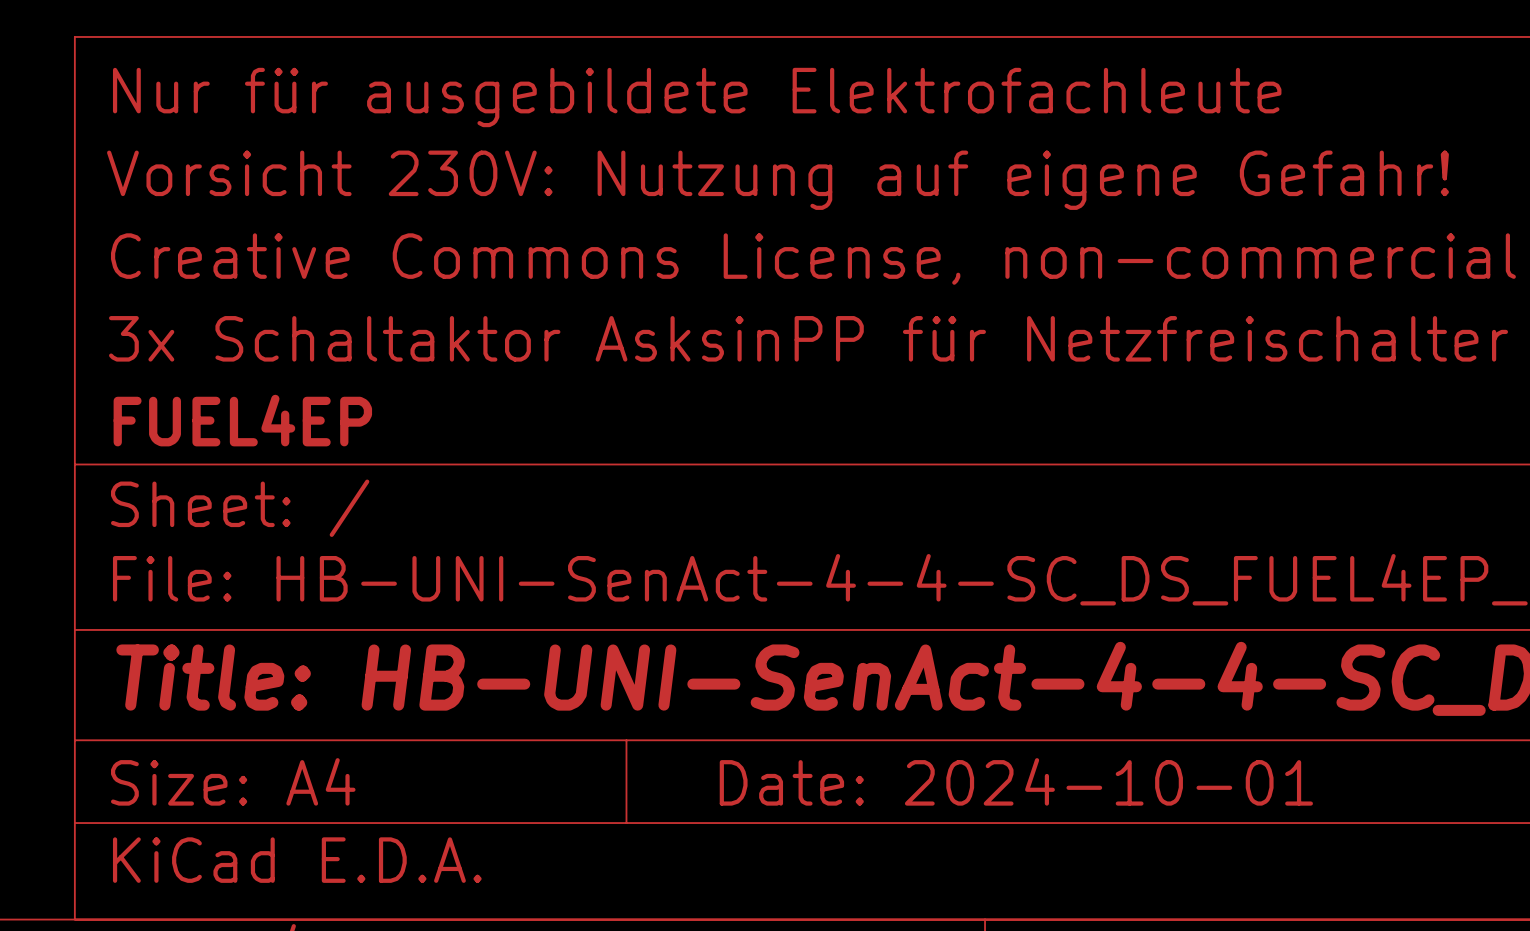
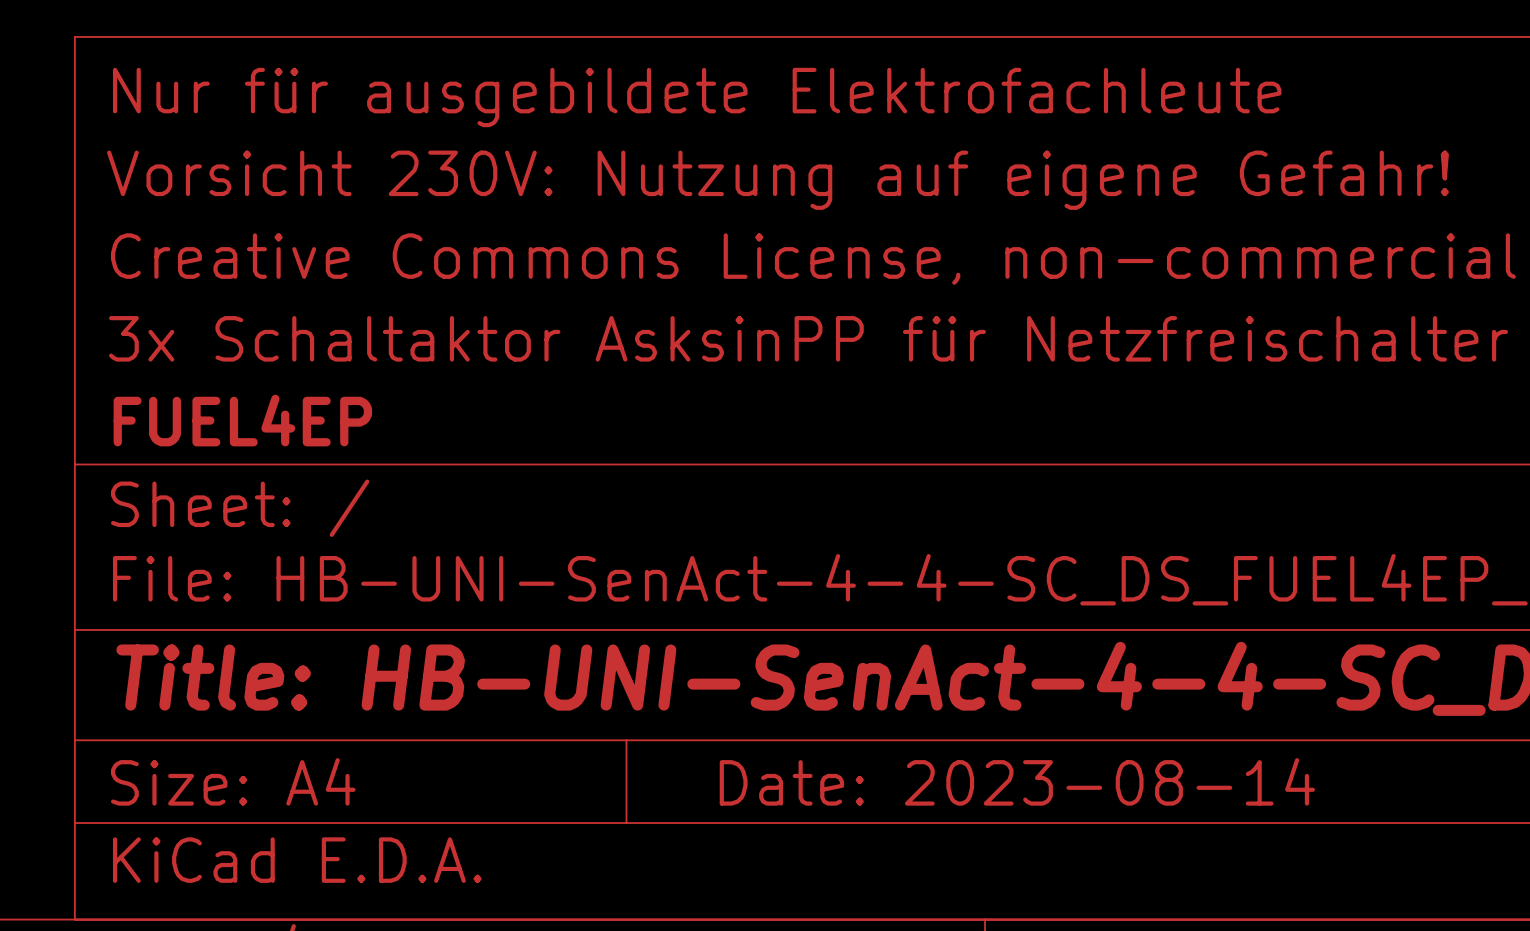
title block: Date: 2024-10-01 (1016, 781) -> Date: 2023-08-14 (1017, 781)

